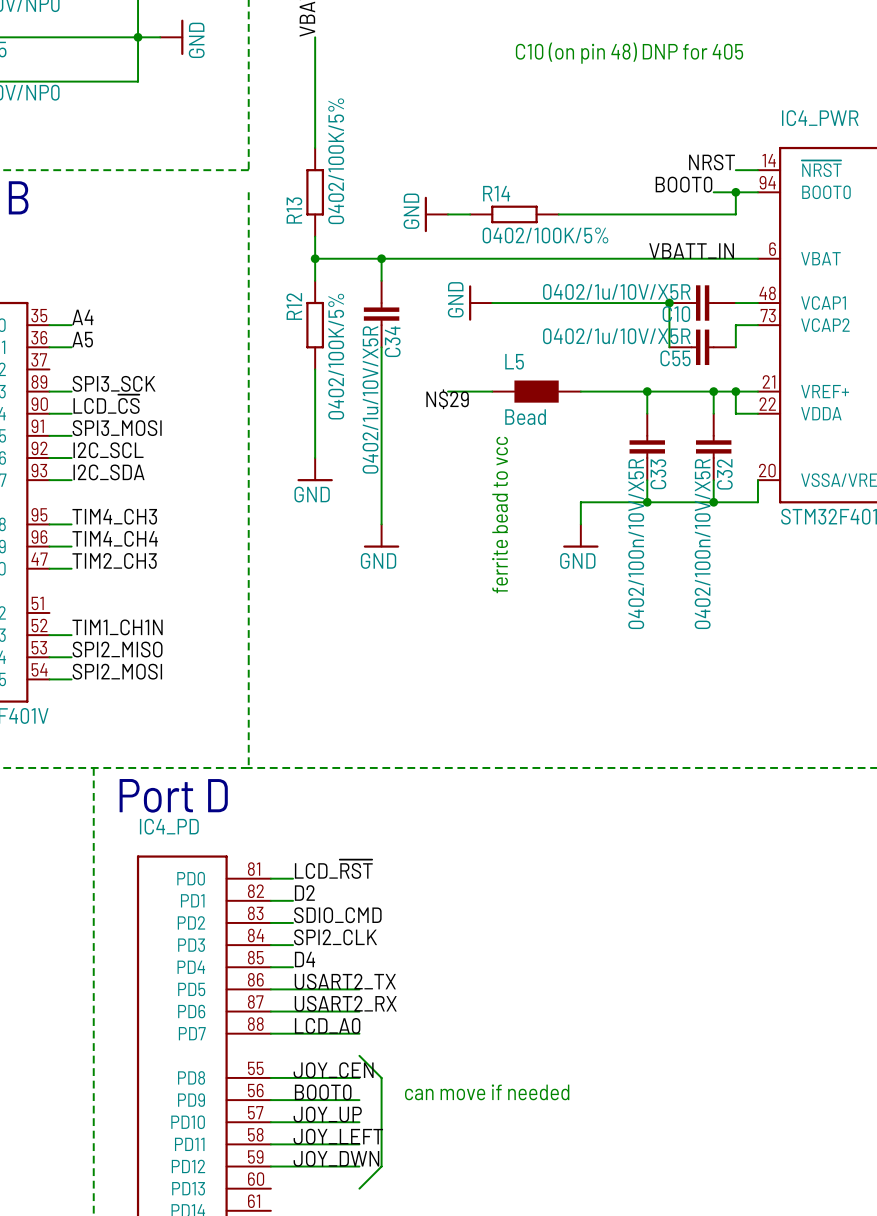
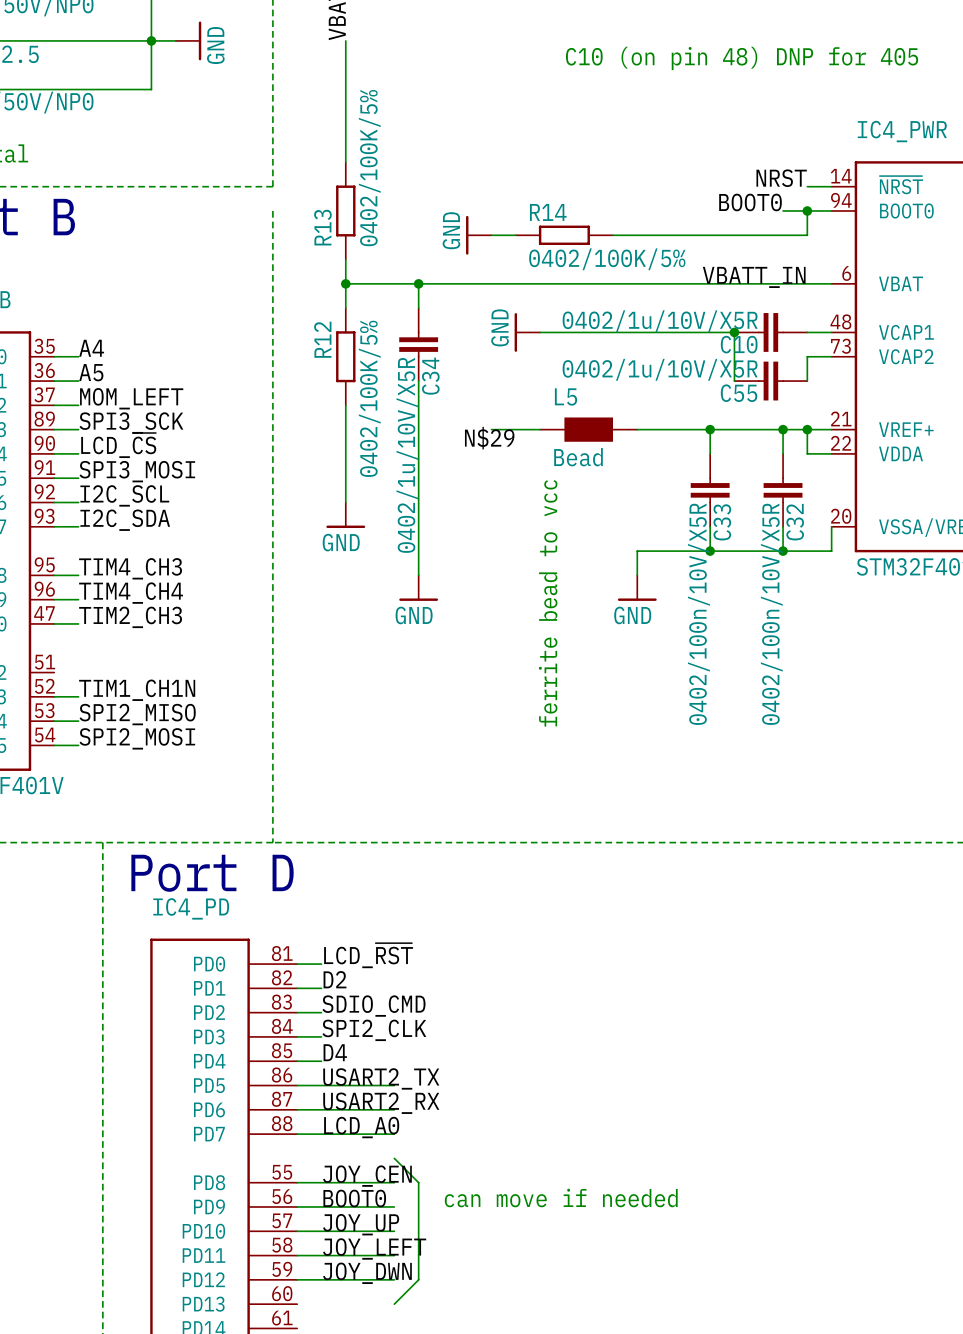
label: none -> MOM_LEFT (131, 398)
wire: none -> (54, 405) (78, 405)

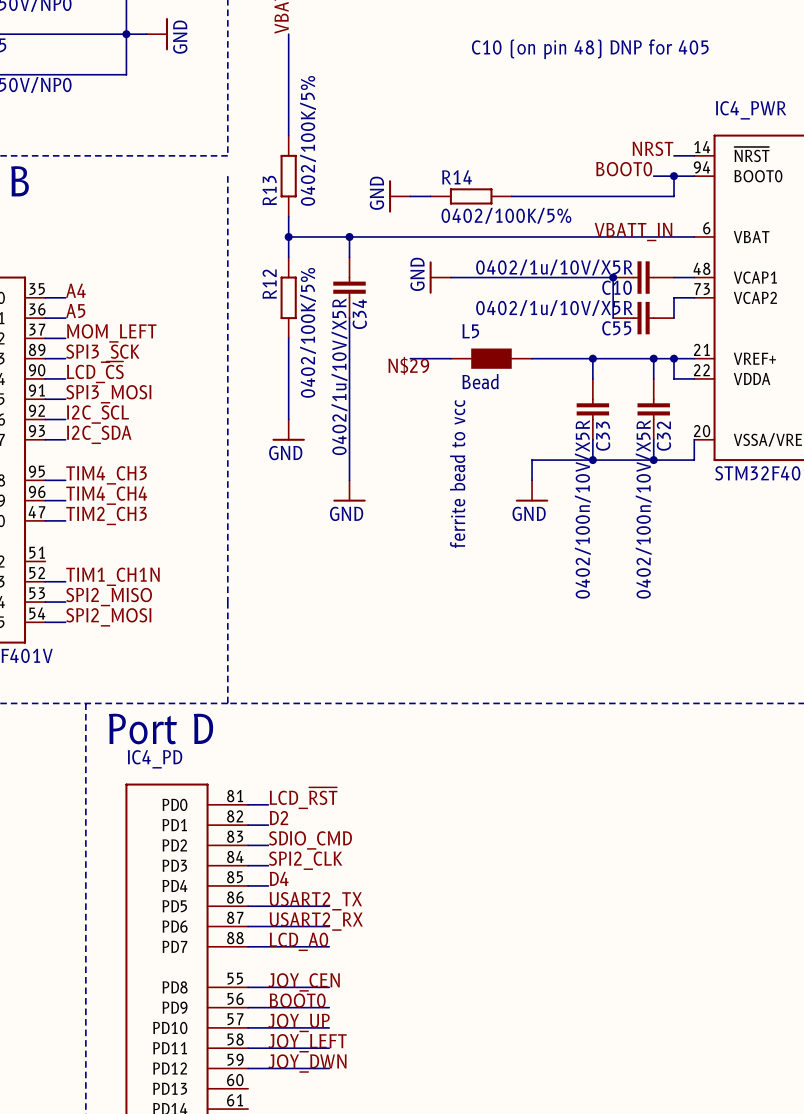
wire: (394, 1158) (418, 1182) (418, 1279) (394, 1304) -> none
text: can move if needed (561, 1198) -> none

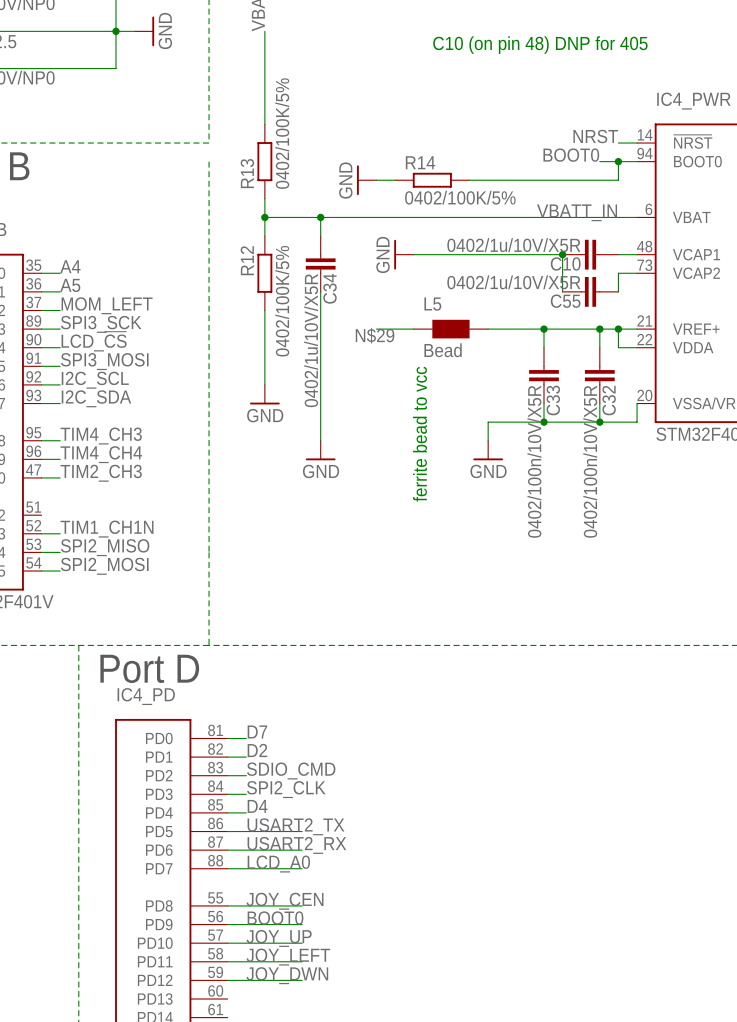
label: LCD_~{RST} (303, 798) -> D7 (257, 731)

